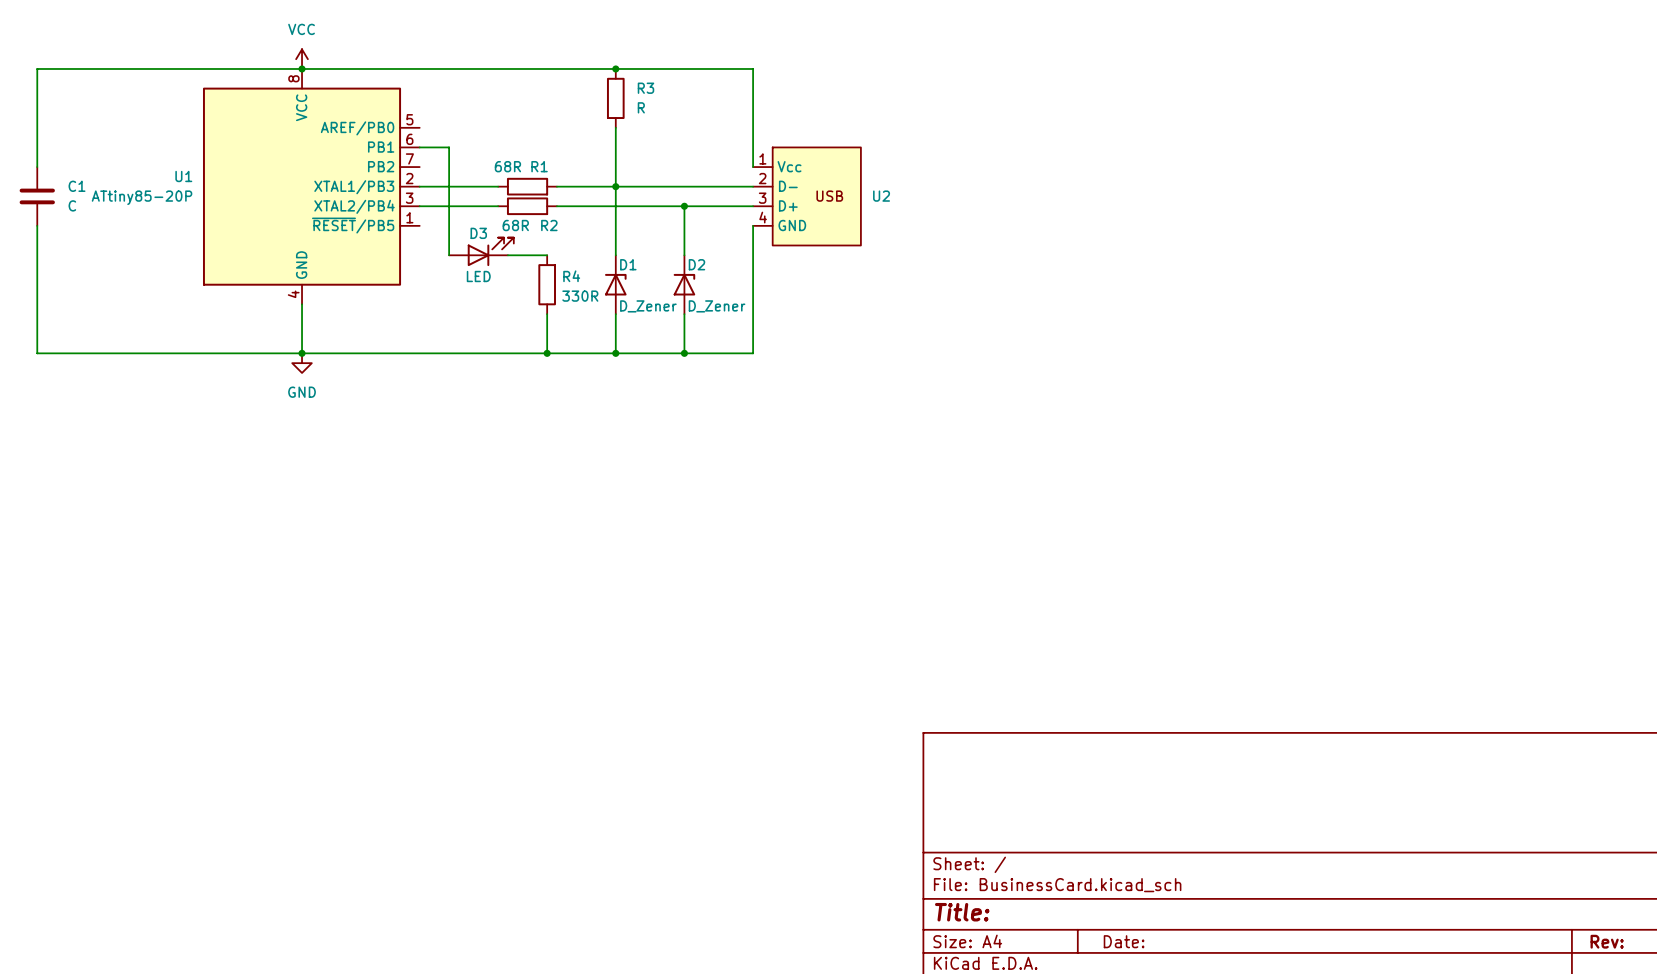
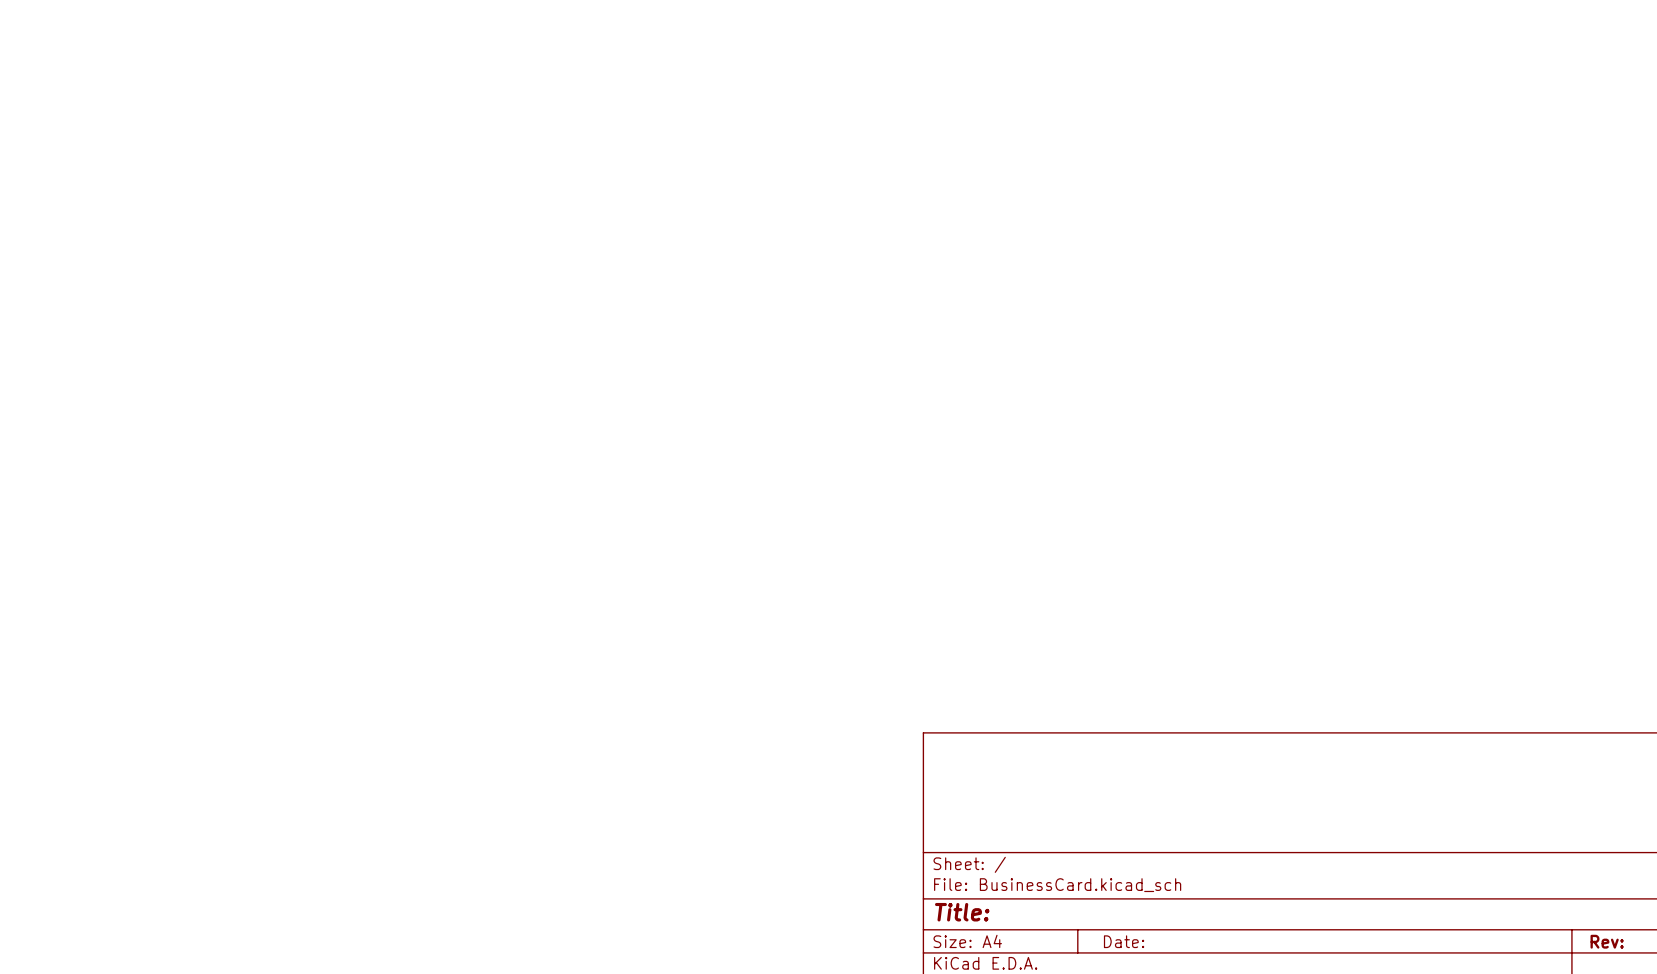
power symbol: VCC (302, 59) -> none
junction: (302, 68) -> none
junction: (615, 68) -> none
R3: R (615, 98) -> none
wire: (615, 127) (615, 255) -> none
wire: (419, 147) (449, 147) (449, 255) -> none
wire: (37, 167) (37, 68) (753, 68) (753, 167) -> none
U1: ATtiny85-20P (311, 186) -> none
wire: (419, 186) (498, 186) -> none
R1: 68R (527, 186) -> none
wire: (556, 186) (753, 186) -> none
junction: (615, 186) -> none
C1: C (37, 196) -> none
U2: (807, 196) -> none
wire: (419, 206) (498, 206) -> none
R2: 68R (527, 206) -> none
wire: (556, 206) (753, 206) -> none
wire: (684, 206) (684, 255) -> none
junction: (684, 206) -> none
wire: (37, 225) (37, 353) (753, 353) (753, 225) -> none
D3: LED (481, 251) -> none
wire: (507, 255) (547, 255) -> none
R4: 330R (547, 284) -> none
D1: D_Zener (615, 284) -> none
D2: D_Zener (684, 284) -> none
wire: (302, 304) (302, 353) -> none
wire: (547, 314) (547, 353) -> none
wire: (615, 314) (615, 353) -> none
wire: (684, 314) (684, 353) -> none
junction: (302, 353) -> none
junction: (547, 353) -> none
junction: (615, 353) -> none
junction: (684, 353) -> none
power symbol: GND (302, 363) -> none

